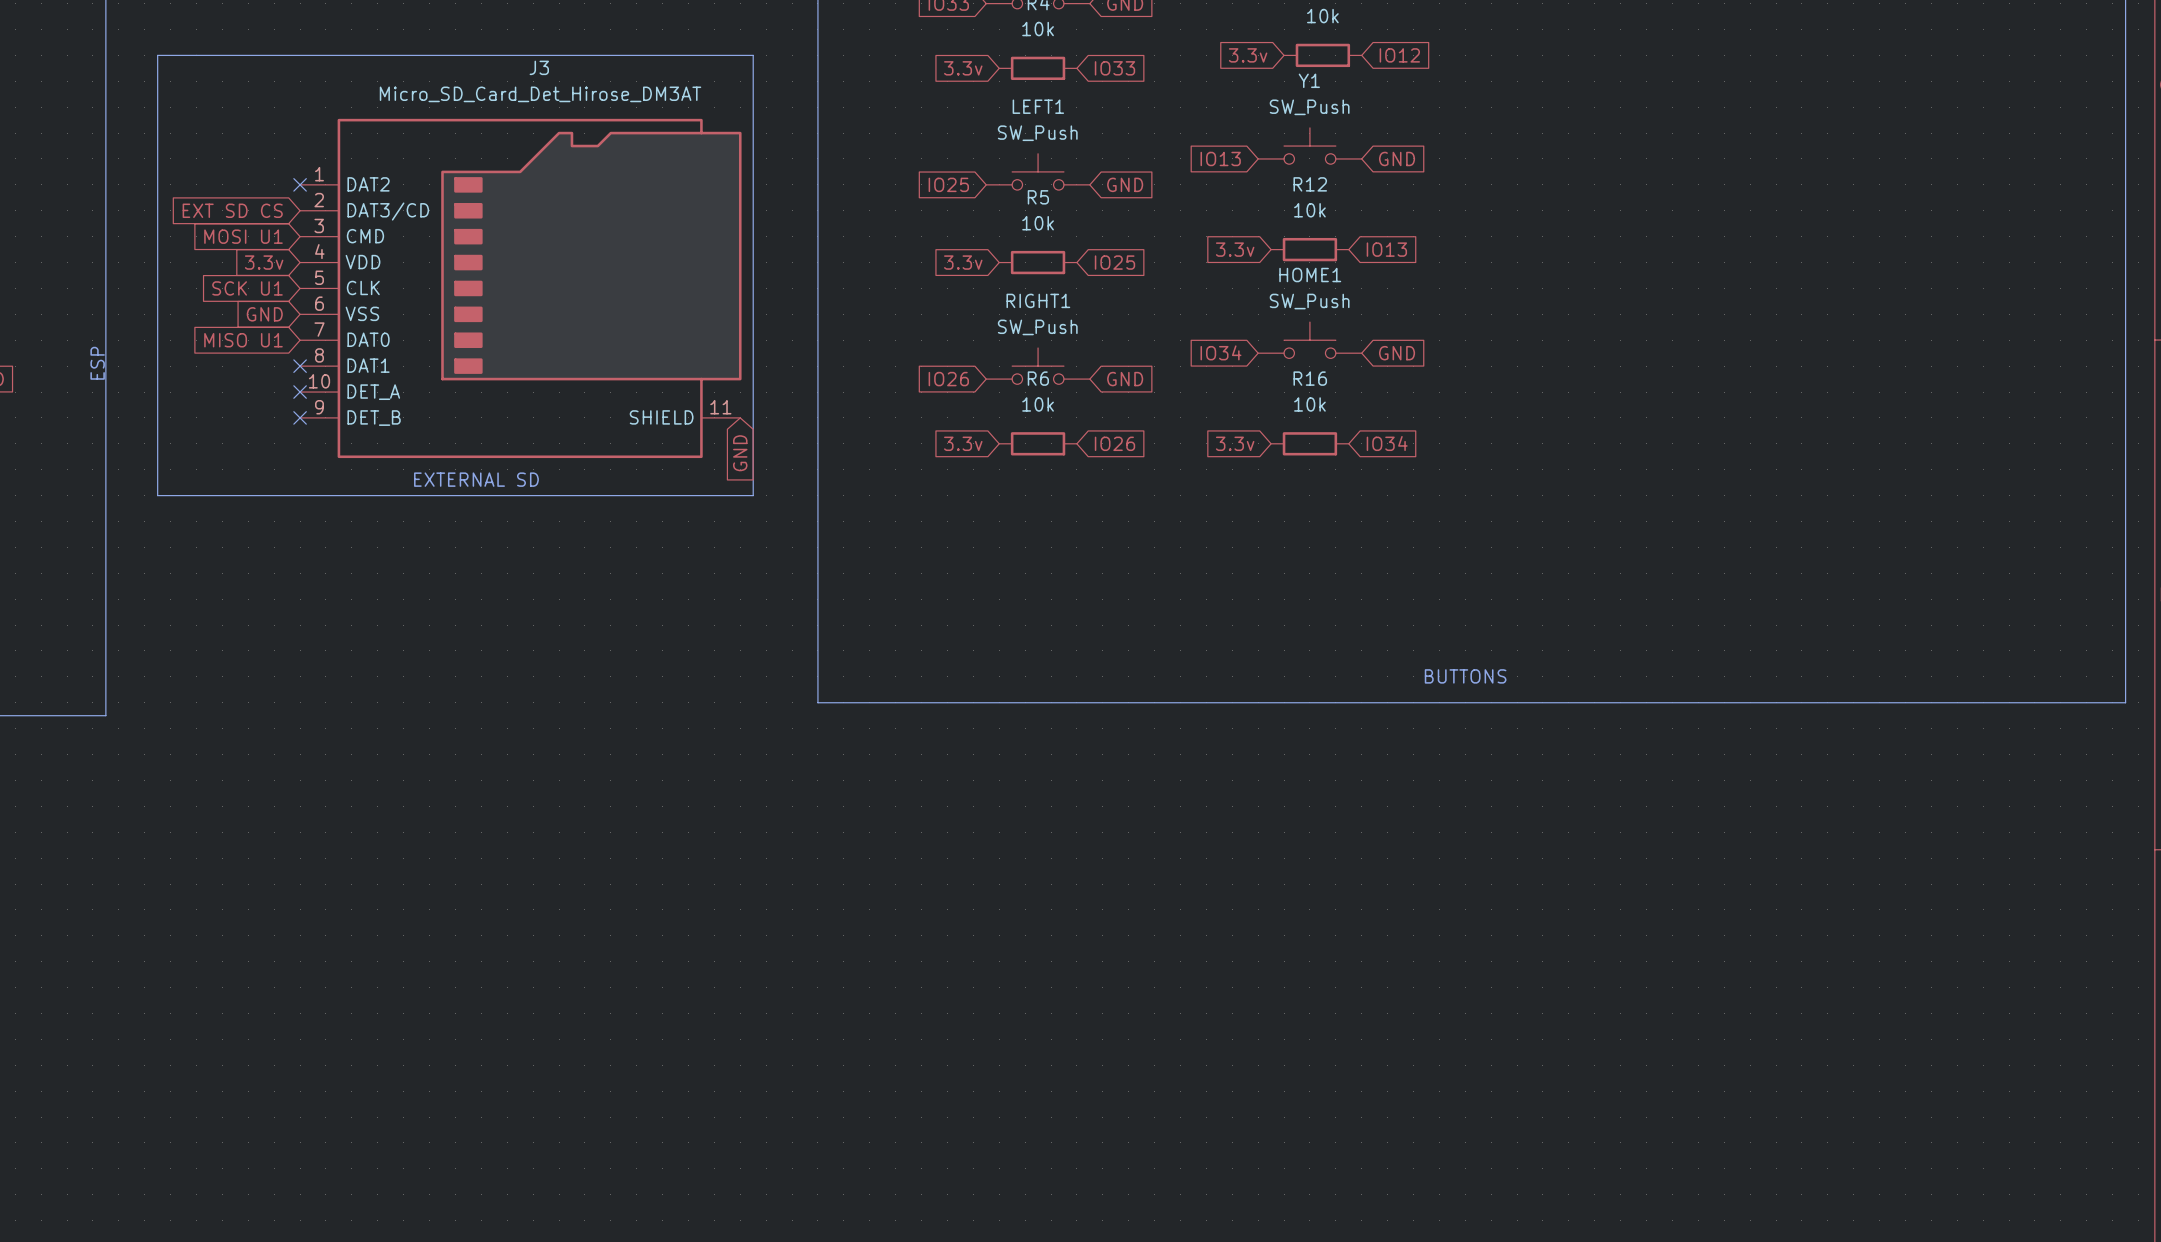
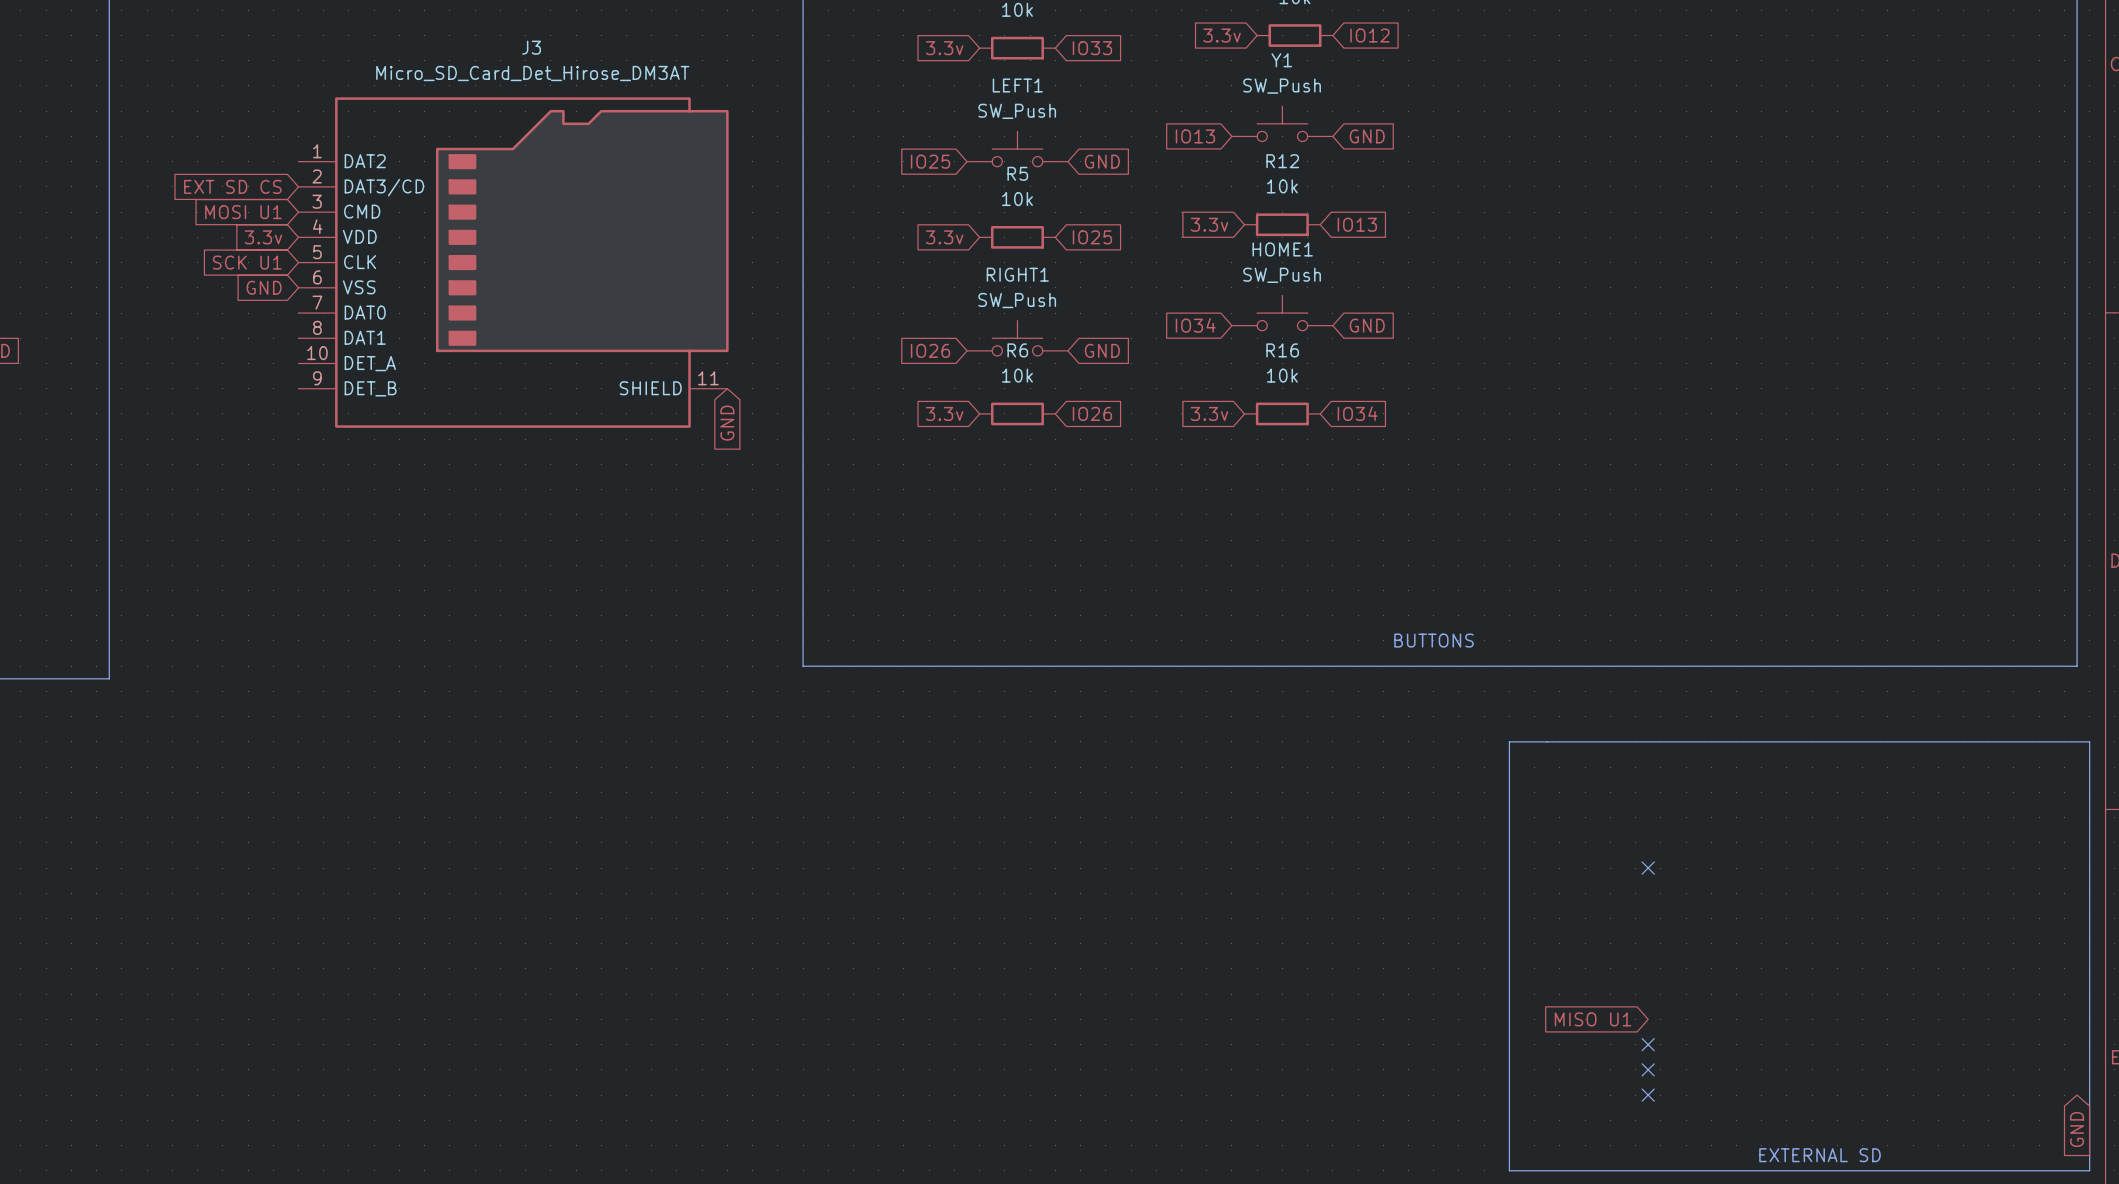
line: (157, 55) (753, 55) (753, 495) (157, 495) (157, 55) -> none
no-connect mark: (300, 184) -> none
global label: MISO U1 (243, 340) -> none
text: ESP (97, 363) -> none
no-connect mark: (300, 366) -> none
no-connect mark: (300, 392) -> none
no-connect mark: (300, 417) -> none
text: EXTERNAL SD (476, 479) -> none
line: none -> (1509, 741) (2089, 741) (2089, 1170) (1509, 1170) (1509, 741)
no-connect mark: none -> (1648, 868)
global label: none -> MISO U1 (1593, 1019)
no-connect mark: none -> (1648, 1044)
no-connect mark: none -> (1648, 1069)
no-connect mark: none -> (1648, 1095)
global label: none -> GND (2077, 1129)
text: none -> EXTERNAL SD (1820, 1155)

